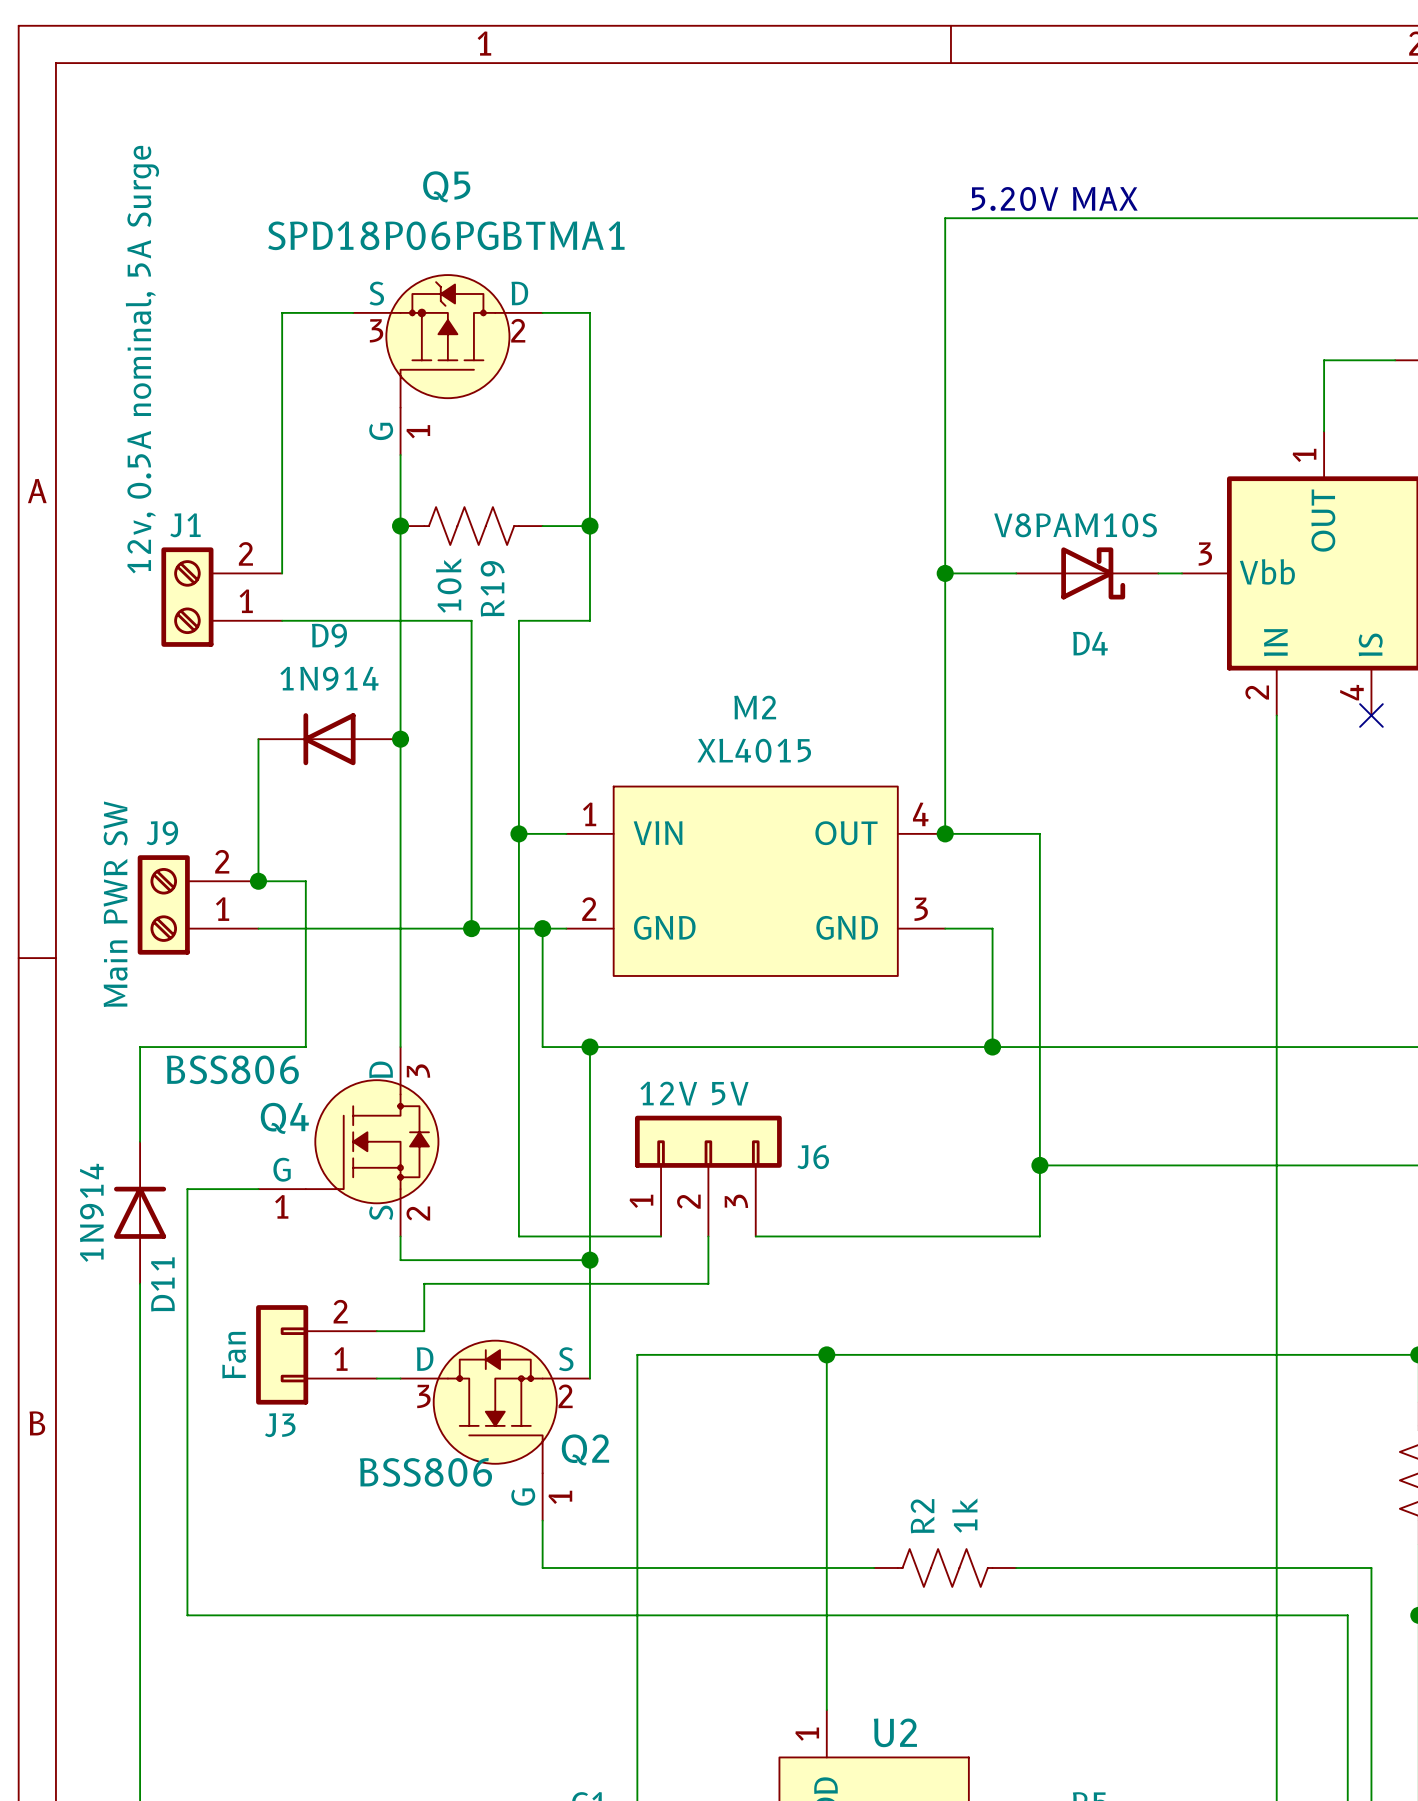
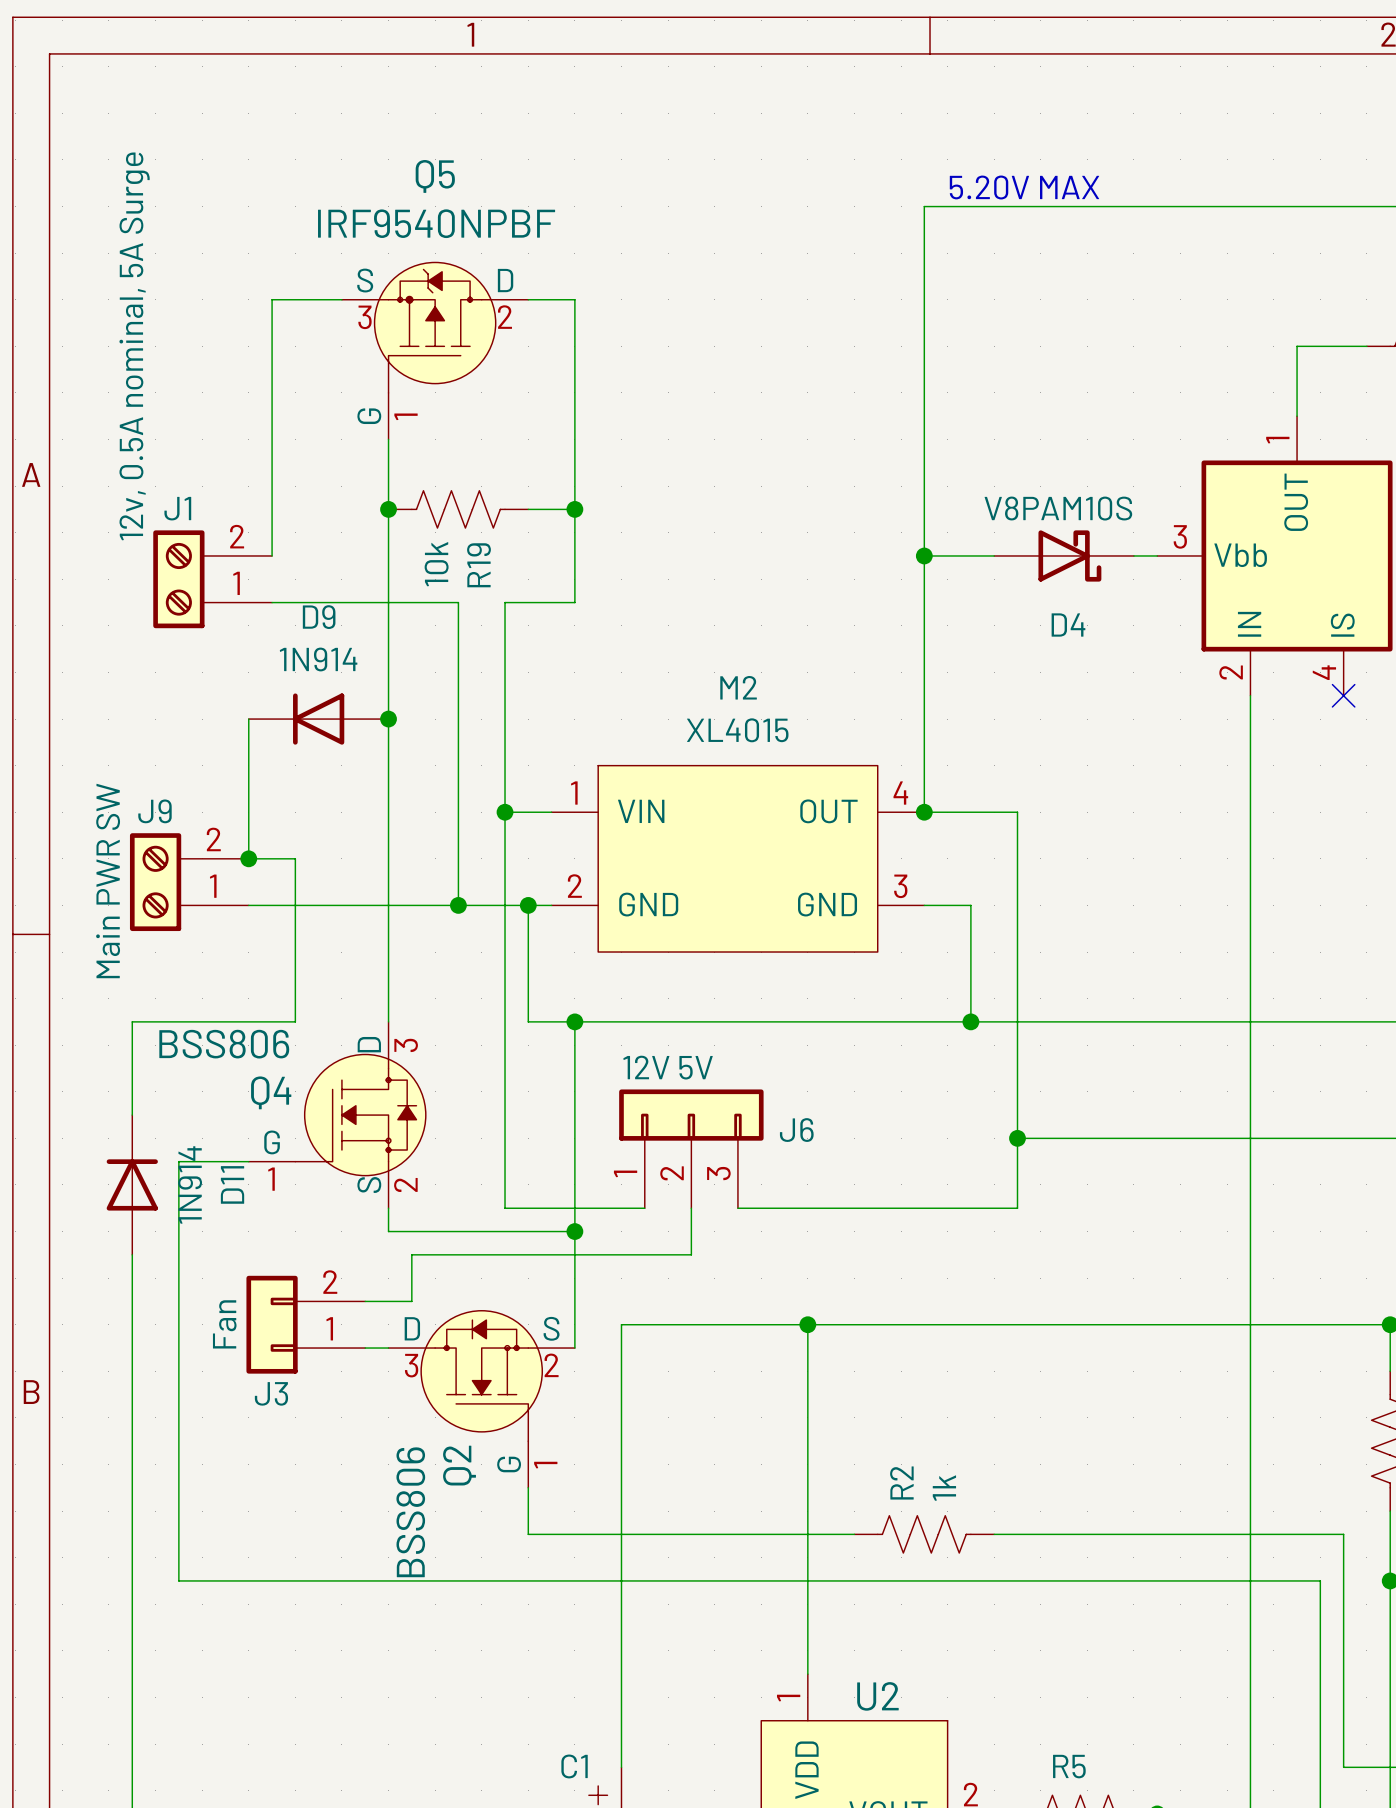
Q5 value: SPD18P06PGBTMA1 (446, 235) -> IRF9540NPBF (436, 223)
D11 value position: 1N914 (91, 1212) -> 1N914 (190, 1185)
D11 name position: D11 (162, 1284) -> D11 (232, 1184)
Q2 name rotation: 0° (585, 1449) -> 90° counterclockwise (459, 1465)
Q2 name position: Q2 (585, 1449) -> Q2 (459, 1465)
Q2 value rotation: 0° (425, 1472) -> 90° counterclockwise (410, 1512)

